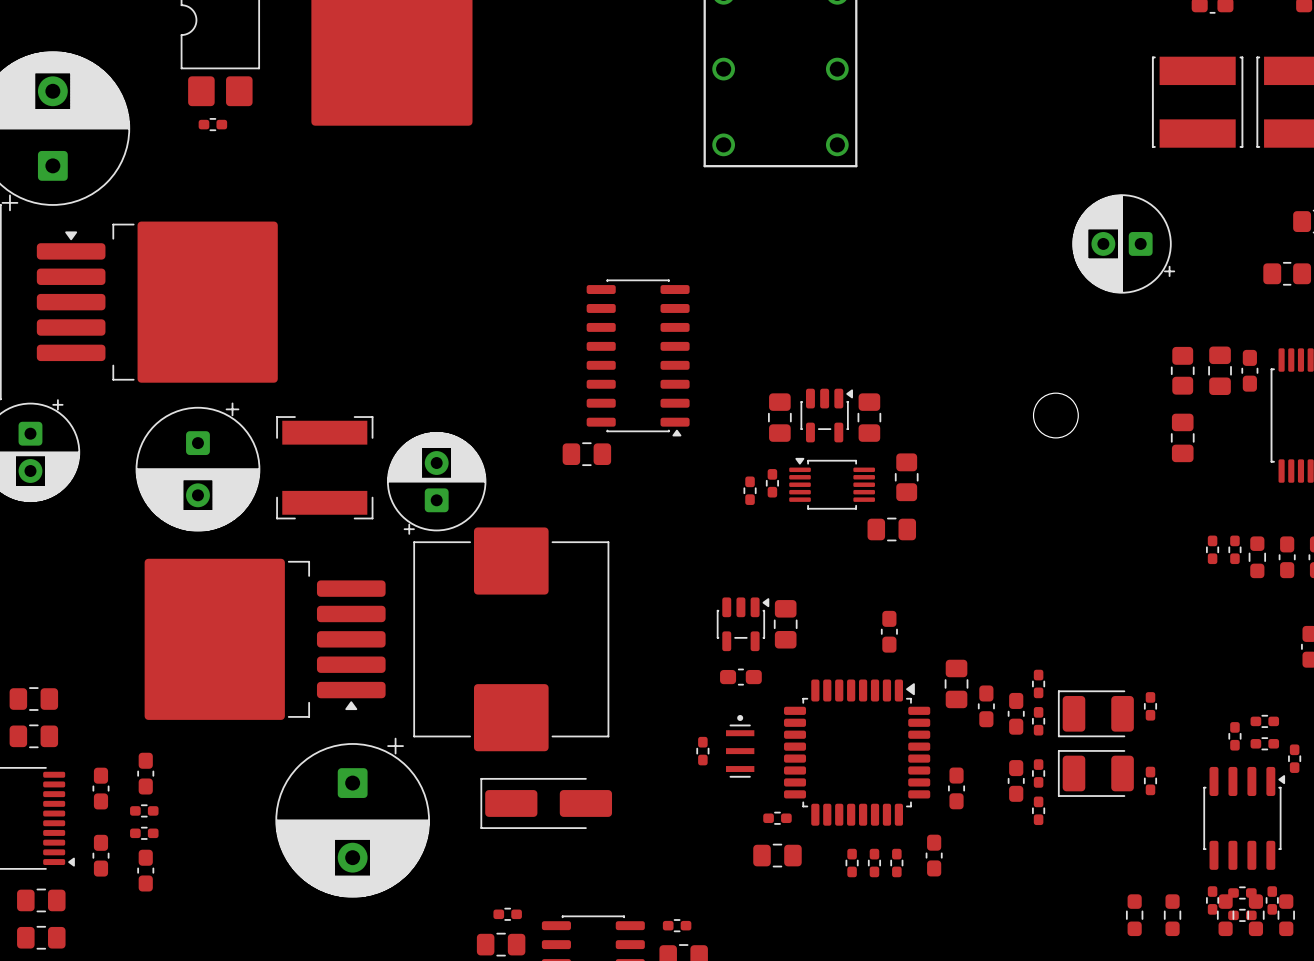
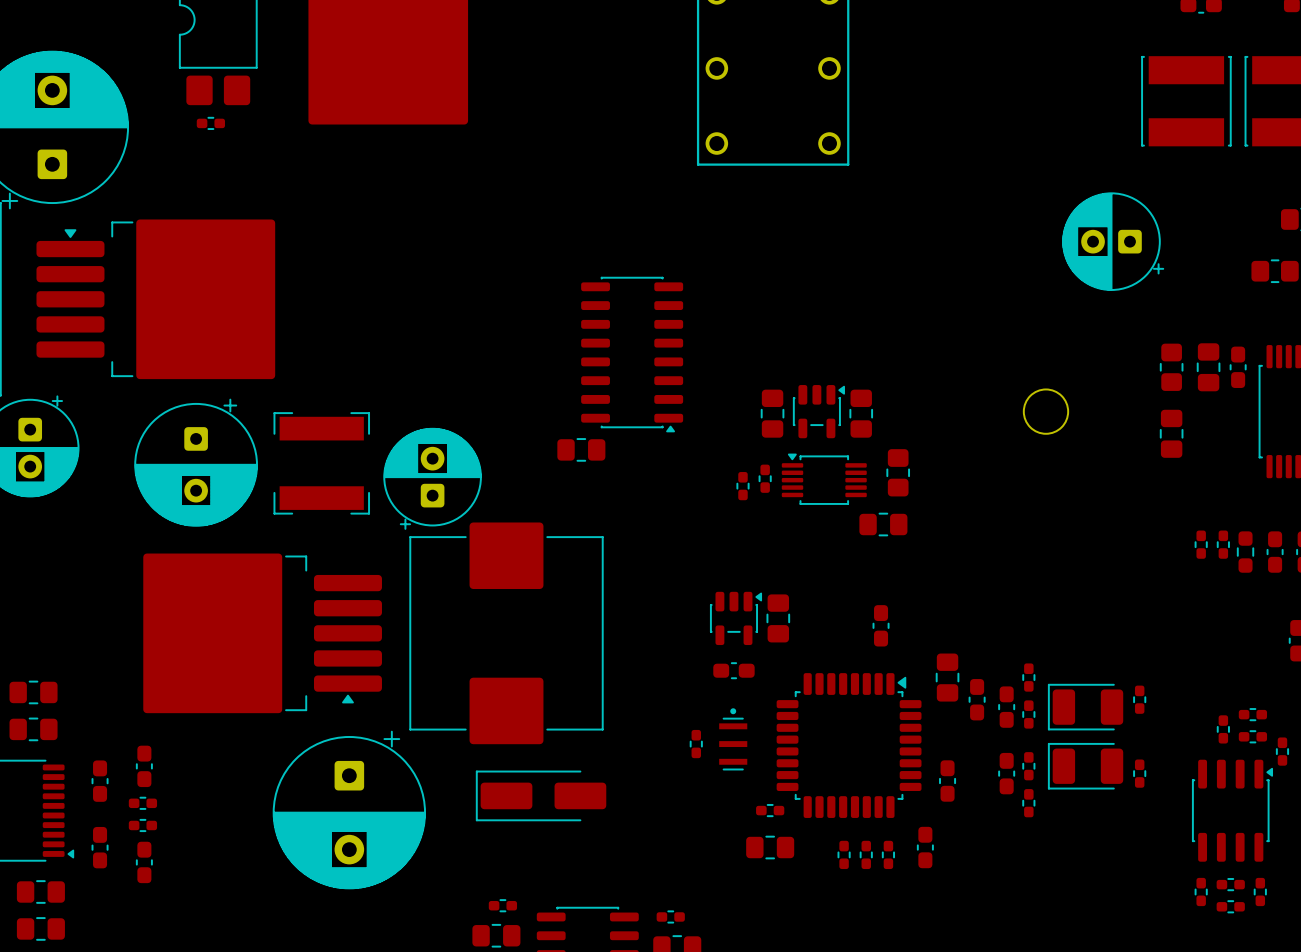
part: (1134, 915) -> none
part: (1172, 915) -> none
part: (1225, 915) -> none
part: (1255, 915) -> none
part: (1286, 915) -> none

